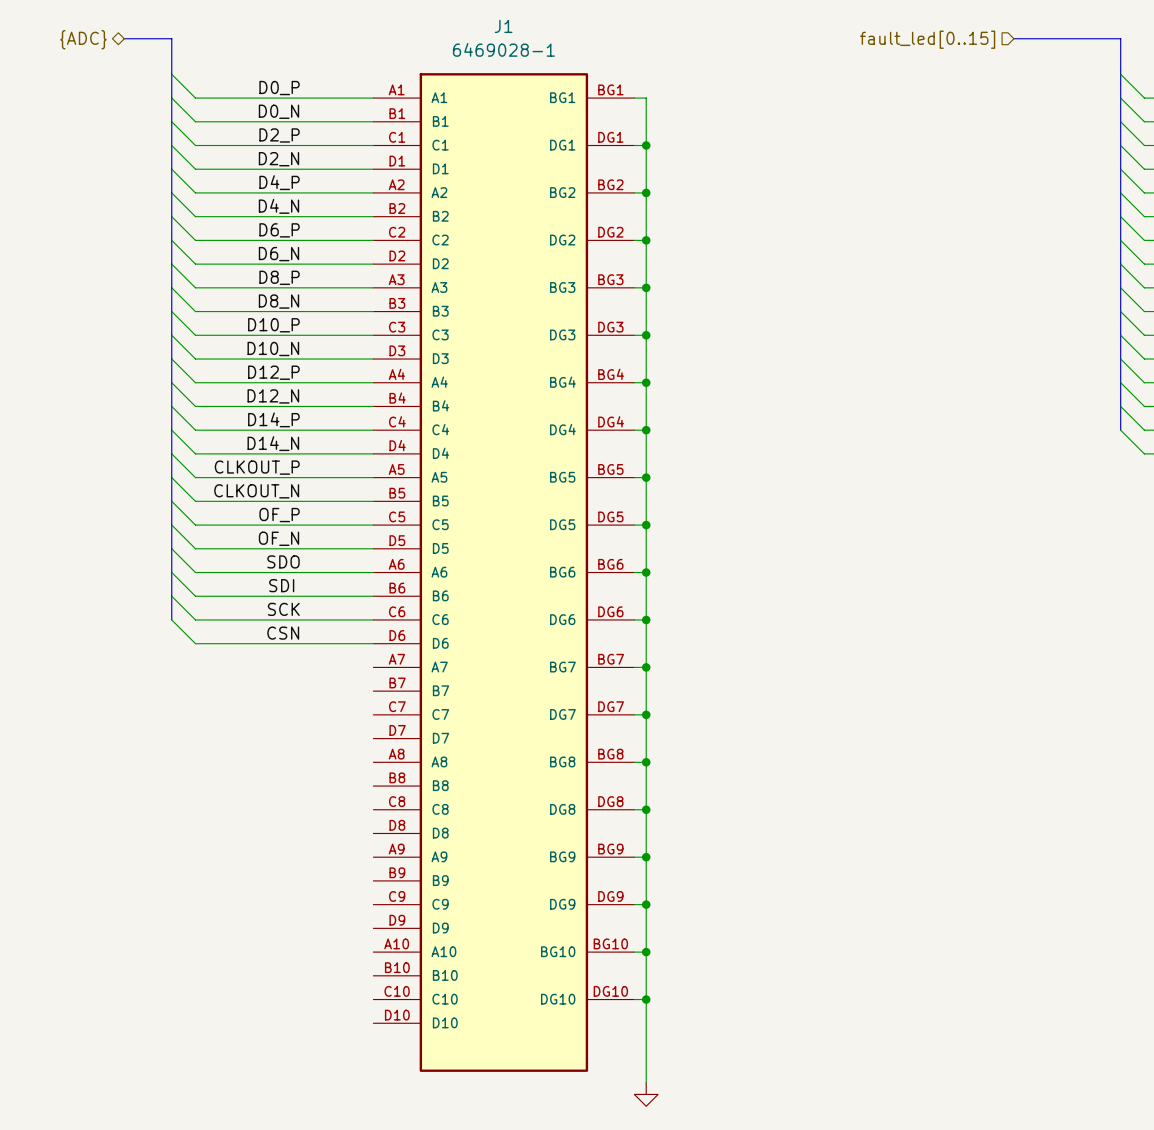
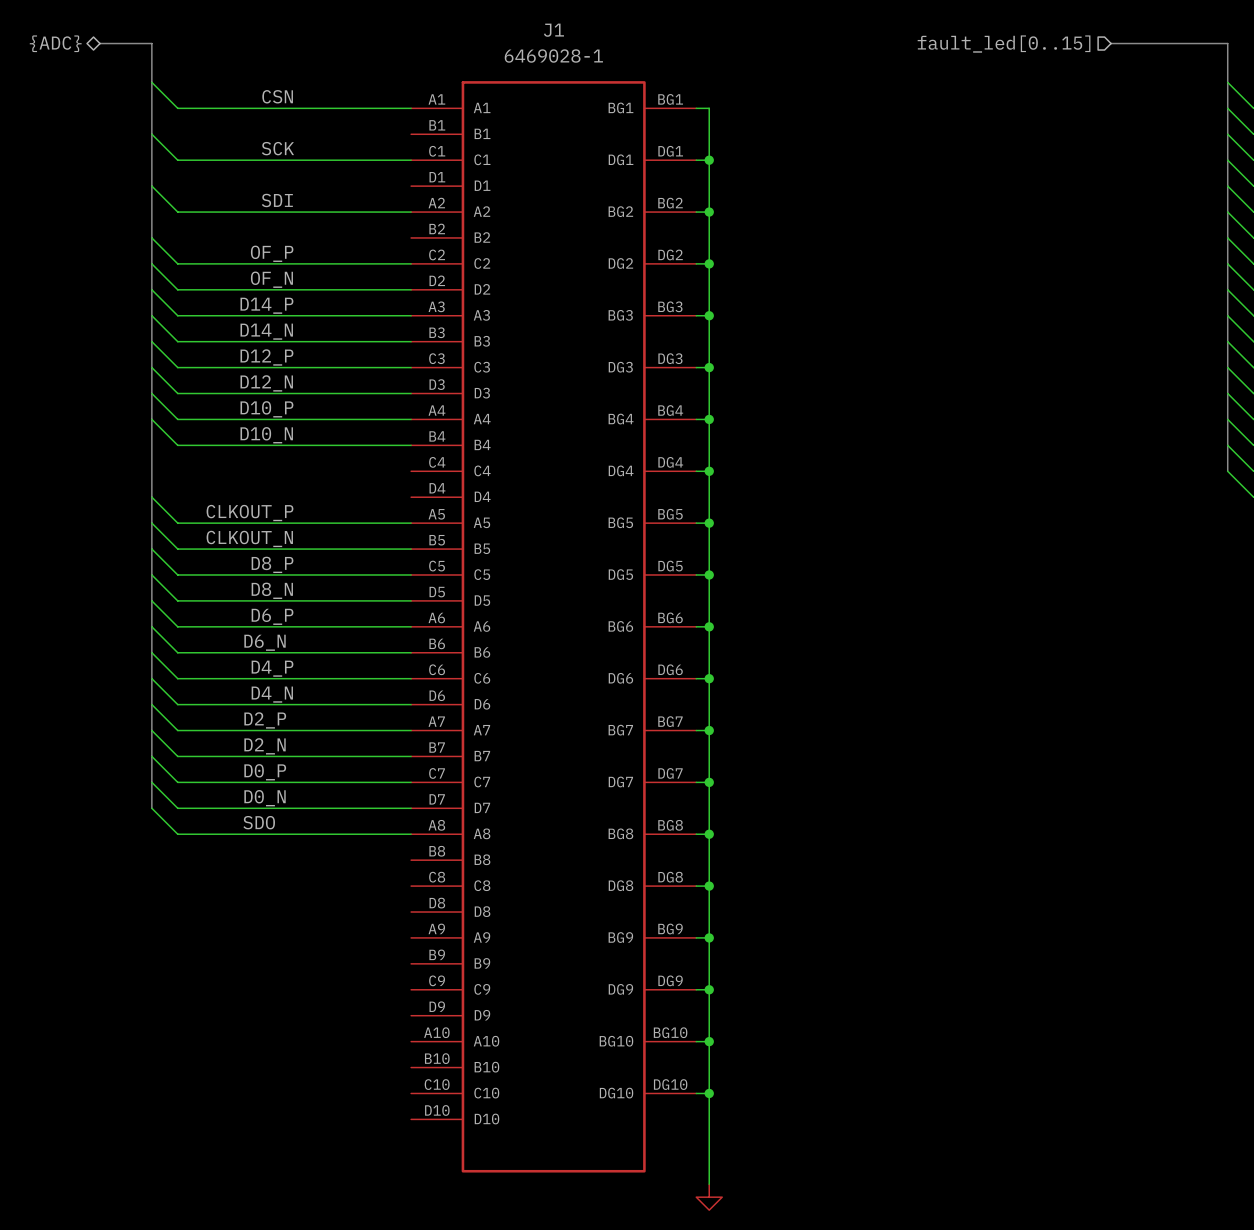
bus: none -> (100, 43) (138, 43)
bus: (136, 38) (171, 38) (171, 619) -> (151, 43) (151, 808)
hierarchical label position: {ADC} (83, 39) -> {ADC} (55, 43)
wire: (171, 74) (195, 98) -> (151, 82) (177, 108) (216, 108)
label: none -> CSN (277, 96)
label: D0_P (279, 88) -> none
wire: (171, 98) (195, 121) (373, 121) -> none
label: D0_N (278, 111) -> none
wire: (171, 121) (195, 145) -> (151, 134) (177, 160) (216, 160)
label: none -> SCK (277, 148)
label: D2_P (279, 135) -> none
wire: (171, 145) (195, 169) (373, 169) -> none
label: D2_N (278, 159) -> none
wire: (171, 169) (195, 192) -> (151, 186) (177, 212) (216, 212)
label: none -> SDI (277, 200)
label: D4_P (279, 182) -> none
wire: (171, 192) (195, 216) (373, 216) -> none
label: D4_N (278, 206) -> none
wire: (171, 216) (195, 240) -> (151, 237) (177, 263) (216, 263)
label: none -> OF_P (272, 253)
label: D6_P (279, 230) -> none
wire: (171, 240) (195, 264) -> (151, 263) (177, 289) (216, 289)
label: none -> OF_N (271, 279)
label: D6_N (278, 254) -> none
wire: (171, 264) (195, 287) -> (151, 289) (177, 315) (216, 315)
label: D8_P (279, 277) -> none
wire: (171, 287) (195, 311) -> (151, 315) (177, 341) (216, 341)
label: D8_N (278, 301) -> none
wire: (171, 311) (195, 335) -> (151, 341) (177, 367) (216, 367)
label position: D10_P (273, 325) -> D10_P (266, 409)
wire: (171, 335) (195, 359) -> (151, 367) (177, 393) (216, 393)
label position: D10_N (273, 348) -> D10_N (266, 435)
wire: (171, 359) (195, 382) -> (151, 393) (177, 419) (216, 419)
label position: D12_P (273, 372) -> D12_P (266, 357)
wire: (171, 382) (195, 406) -> (151, 419) (177, 445) (216, 445)
label position: D12_N (273, 396) -> D12_N (266, 383)
wire: (171, 406) (195, 430) (373, 430) -> none
label position: D14_P (273, 419) -> D14_P (266, 305)
wire: (171, 430) (195, 453) (373, 453) -> none
label position: D14_N (273, 443) -> D14_N (266, 331)
wire: (171, 453) (195, 477) -> (151, 497) (177, 523) (216, 523)
label position: CLKOUT_P (257, 467) -> CLKOUT_P (249, 513)
wire: (171, 477) (195, 501) -> (151, 523) (177, 549) (216, 549)
label position: CLKOUT_N (256, 491) -> CLKOUT_N (249, 538)
wire: (171, 501) (195, 525) -> (151, 549) (177, 574) (216, 574)
label: none -> D8_P (272, 564)
label: OF_P (279, 515) -> none
wire: (171, 525) (195, 548) -> (151, 574) (177, 600) (216, 600)
label: none -> D8_N (272, 590)
label: OF_N (278, 538) -> none
wire: (171, 548) (195, 572) -> (151, 600) (177, 626) (216, 626)
label position: SDO (283, 561) -> SDO (259, 822)
label: none -> D6_P (272, 616)
wire: (171, 572) (195, 596) -> (151, 626) (177, 652) (216, 652)
label: SDI (281, 585) -> none
label: none -> D6_N (265, 642)
wire: (171, 596) (195, 619) -> (151, 652) (177, 678) (216, 678)
label: none -> D4_P (272, 668)
label: SCK (283, 609) -> none
wire: (171, 619) (195, 643) -> (151, 678) (177, 704) (216, 704)
label: none -> D4_N (272, 694)
label: CSN (283, 633) -> none
wire: none -> (151, 704) (177, 730) (411, 730)
label: none -> D2_P (265, 720)
wire: none -> (151, 730) (177, 756) (411, 756)
label: none -> D2_N (265, 746)
wire: none -> (151, 756) (177, 782) (411, 782)
label: none -> D0_P (265, 772)
wire: none -> (151, 782) (177, 808) (411, 808)
label: none -> D0_N (265, 798)
wire: none -> (151, 808) (177, 834) (411, 834)

